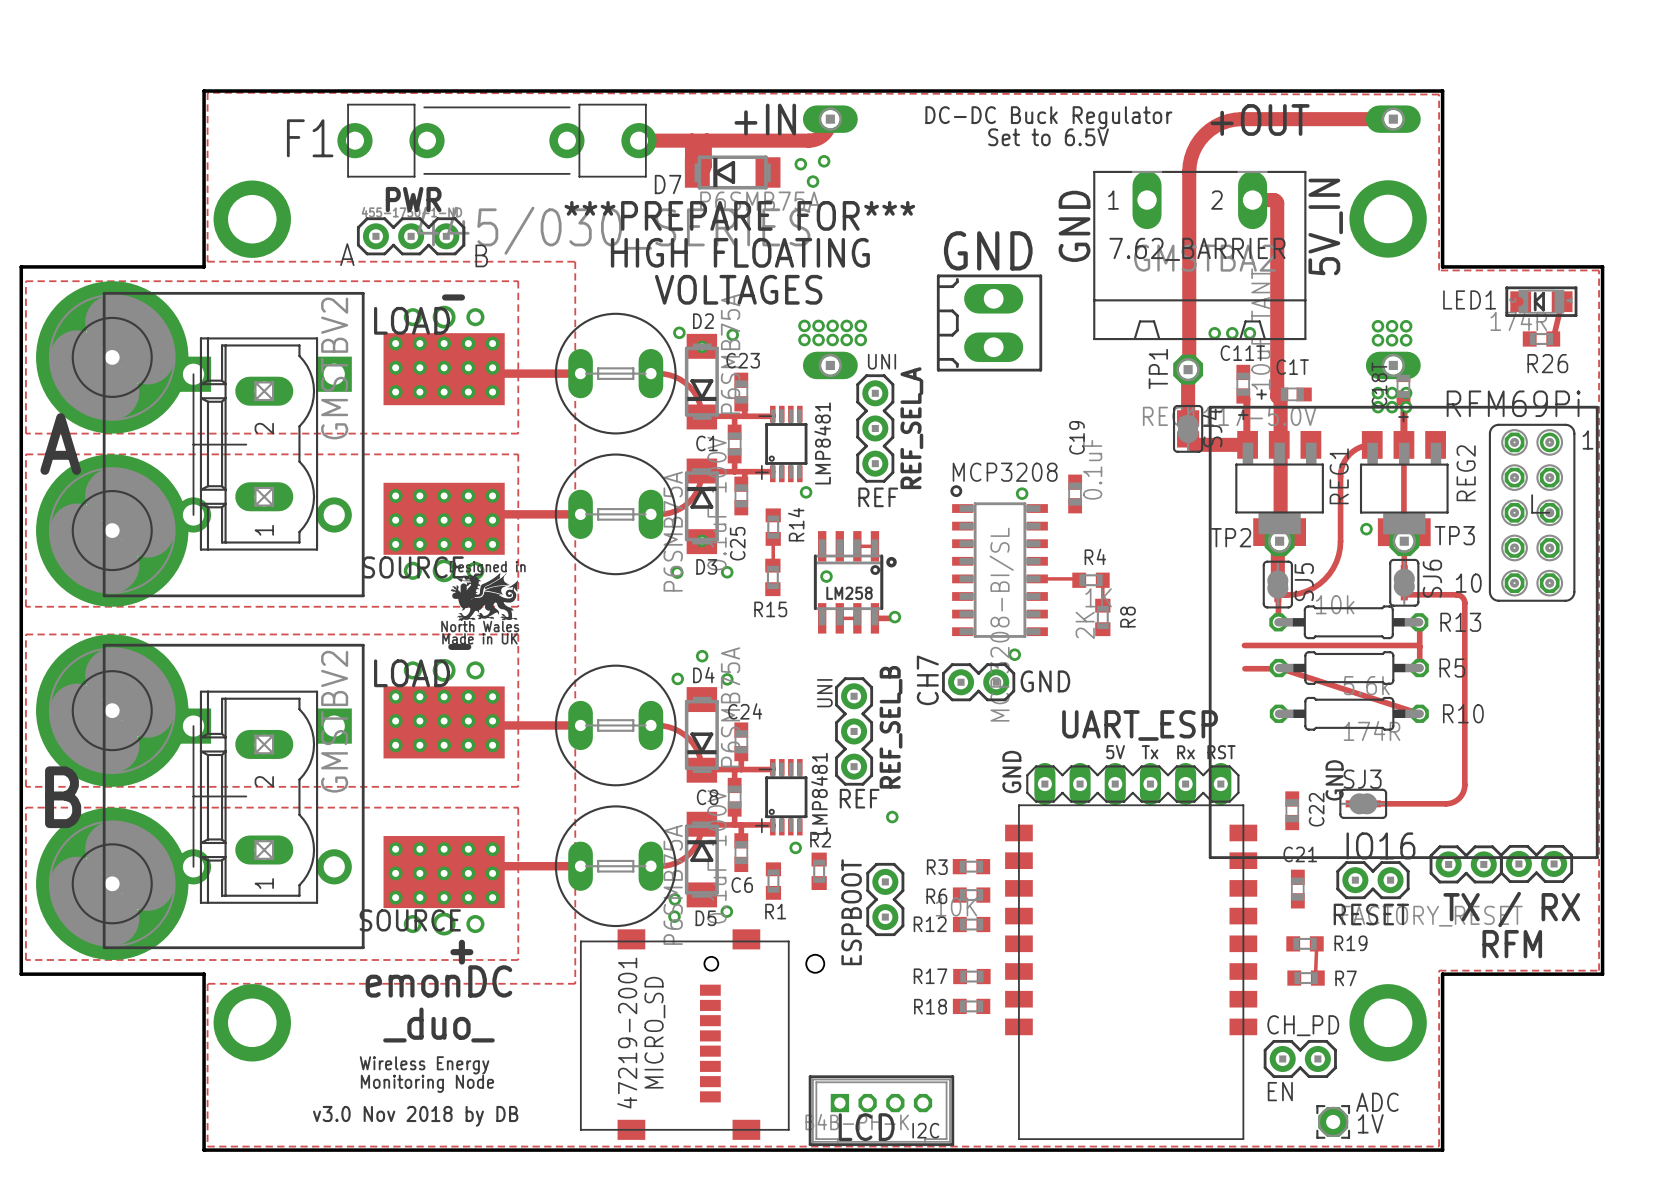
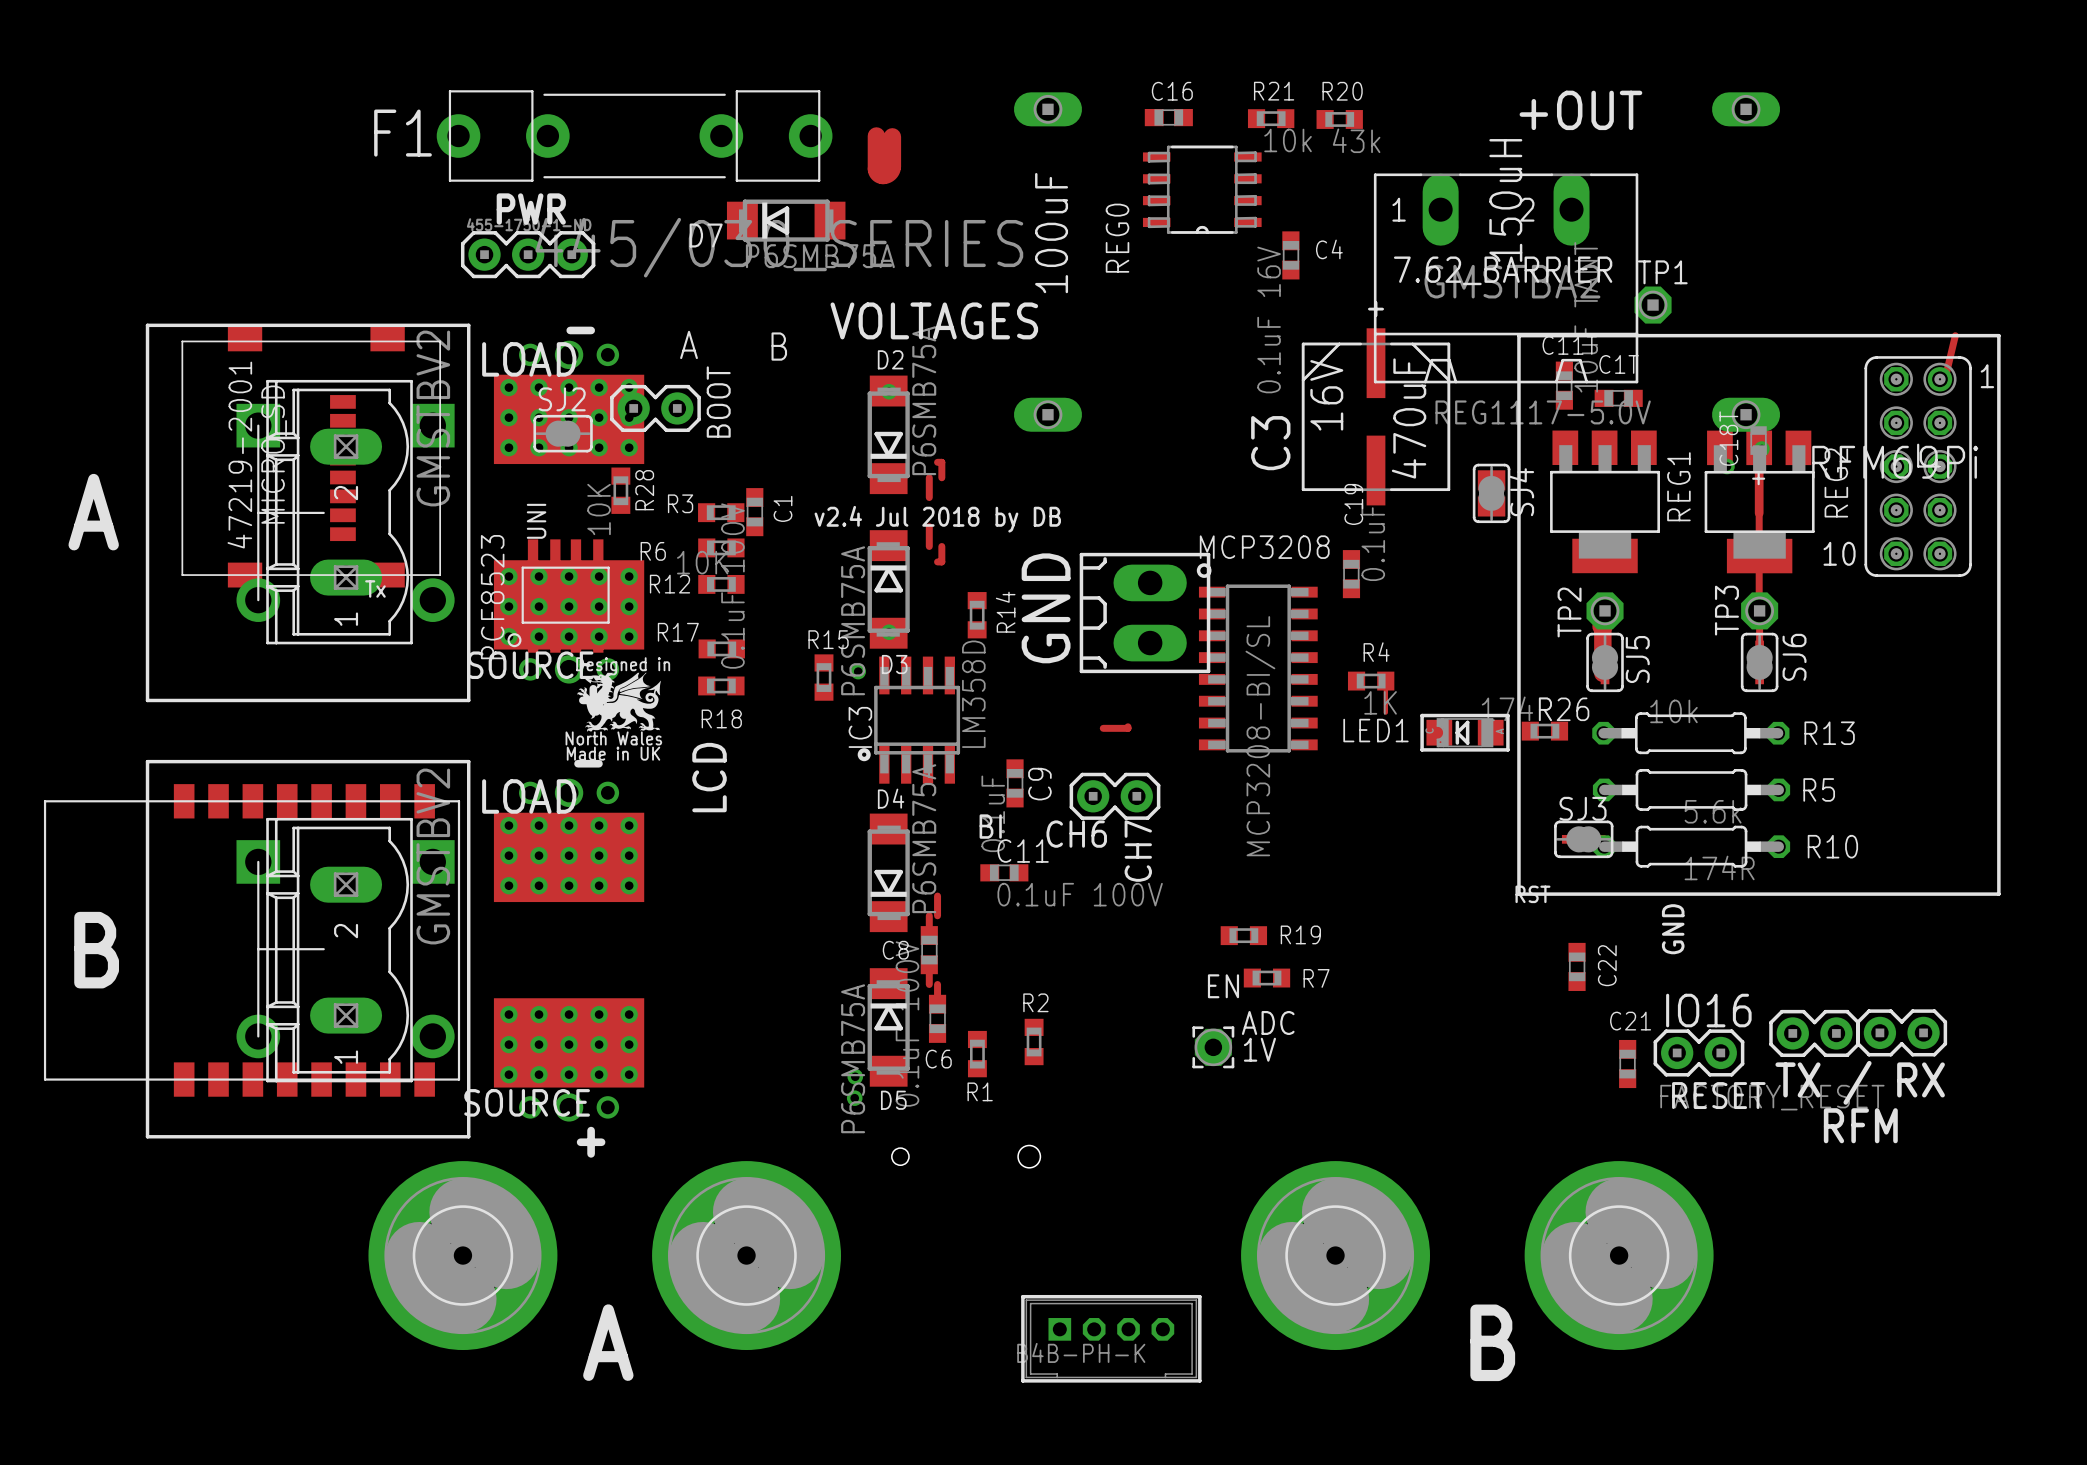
board edge: (204, 90) (204, 266) (21, 266) (21, 974) (204, 974) (204, 1150) (1442, 1150) (1442, 974) (1602, 974) (1602, 266) (1442, 266) (1442, 90) (204, 90) -> none
zone outline: (207, 92) (207, 261) (575, 261) (575, 983) (207, 983) (207, 1146) (1439, 1146) (1439, 970) (1599, 970) (1599, 270) (1439, 270) (1439, 94) (207, 92) -> none
text: DC-DC Buck Regulator (1048, 117) -> none
text: +IN (765, 119) -> none
track: (830, 119) (828, 127) (824, 134) (811, 140) (638, 140) -> none
track: (1393, 119) (1235, 119) (1215, 126) (1200, 139) (1193, 151) (1189, 171) (1188, 418) -> none
C16: none -> (1168, 117)
R21: none -> 10k (1271, 118)
R20: none -> 43k (1339, 119)
text: Set to 6.5V (1048, 137) -> none
via: (824, 161) -> none
via: (800, 164) -> none
D7 position: (732, 172) -> (786, 220)
via: (813, 181) -> none
REG0: none -> (1202, 189)
text: none -> 150uH (1505, 200)
track: (1252, 200) (1274, 200) (1277, 203) (1277, 396) -> none
text: ***PREPARE FOR*** (739, 215) -> none
text: none -> 100uF (1051, 233)
via: (1388, 218) -> none
via: (252, 219) -> none
text: GND (1074, 226) -> none
text: 5V_IN (1325, 226) -> none
C4: none -> 0.1uF 16V (1290, 255)
GND name rotation: 0° (988, 250) -> 90° counterclockwise (1046, 608)
text: HIGH FLOATING (740, 252) -> none
text position: A (347, 254) -> A (689, 344)
text position: B (481, 255) -> B (779, 346)
zone outline: (25, 281) (25, 433) (518, 433) (518, 281) (25, 281) -> none
LED1 position: (1541, 301) -> (1465, 732)
GND position: (989, 323) -> (1145, 612)
via: (804, 325) -> none
via: (818, 325) -> none
via: (832, 325) -> none
via: (846, 325) -> none
via: (860, 325) -> none
via: (1377, 326) -> none
via: (1392, 326) -> none
via: (1406, 326) -> none
via: (679, 332) -> none
via: (1214, 333) -> none
via: (1232, 333) -> none
via: (1249, 333) -> none
via: (732, 334) -> none
R26 position: (1541, 338) -> (1544, 731)
via: (804, 340) -> none
via: (818, 340) -> none
via: (832, 340) -> none
via: (846, 340) -> none
via: (860, 340) -> none
via: (1377, 340) -> none
via: (1392, 340) -> none
via: (1406, 340) -> none
text: none -> 16V (1326, 395)
C3: none -> (1376, 403)
part: (112, 357) -> none
BOOT: none -> (655, 408)
text: UNI (882, 361) -> none
R26 name position: R26 (1547, 363) -> R26 (1564, 709)
C11T footprint: [1236, 364, 1251, 421] -> [1555, 361, 1573, 410]
text: none -> 470uF (1409, 418)
TP1 name rotation: 0° (1158, 368) -> 90° clockwise (1662, 272)
track: (444, 369) (448, 373) (580, 373) -> none
TP1 position: (1188, 369) -> (1653, 305)
part: (615, 373) -> none
track: (650, 373) (669, 375) (684, 382) (698, 400) (701, 416) (772, 416) (772, 414) -> none
SJ2: none -> (563, 433)
C1T footprint: [1256, 387, 1312, 402] -> [1594, 389, 1643, 407]
C23: (741, 392) -> none
via: (1377, 393) -> none
via: (1392, 393) -> none
track: (1243, 395) (1246, 399) (1247, 444) (1193, 444) -> none
track: (1277, 396) (1280, 394) (1279, 541) (1278, 397) (1277, 396) -> none
part: none -> (311, 456)
via: (1392, 407) -> none
via: (1406, 407) -> none
R28: none -> 10K (620, 490)
REF_SEL_A: (875, 428) -> none
C1 name rotation: 0° (706, 443) -> 90° counterclockwise (783, 508)
C1 name position: C1 (706, 443) -> C1 (783, 508)
C1 position: (734, 443) -> (754, 512)
part: (786, 443) -> none
text: LMP8481 (822, 443) -> none
track: (1372, 444) (1360, 447) (1352, 451) (1347, 457) (1341, 468) (1340, 548) (1333, 568) (1324, 579) (1307, 591) (1293, 594) (1277, 595) (1278, 622) -> none
text: none -> v2.4 Jul 2018 by DB (937, 519)
text: none -> UNI (536, 521)
zone outline: (25, 454) (25, 606) (518, 606) (518, 454) (25, 454) -> none
track: (701, 471) (772, 471) -> none
track: (701, 471) (698, 488) (685, 505) (670, 512) (650, 514) -> none
REG1 position: (1279, 488) -> (1605, 501)
REG2 position: (1404, 488) -> (1759, 501)
via: (806, 492) -> none
via: (1022, 493) -> none
C25: (741, 495) -> none
text: REF (878, 497) -> none
text: none -> Tx (375, 588)
PCF8523: none -> (558, 596)
track: (580, 514) (434, 514) -> none
part: (615, 514) -> none
via: (1366, 529) -> none
part: (112, 530) -> none
TP3 name rotation: 0° (1454, 535) -> 90° counterclockwise (1726, 610)
TP3 name position: TP3 (1454, 535) -> TP3 (1726, 610)
TP2 name rotation: 0° (1231, 537) -> 90° counterclockwise (1569, 612)
track: (773, 538) (772, 565) -> none
TP2 position: (1279, 541) -> (1605, 610)
TP3 position: (1404, 541) -> (1759, 610)
track: (857, 546) (874, 546) -> none
drawing position: (891, 562) -> (864, 754)
via: (727, 572) -> none
via: (826, 576) -> none
R15 position: (772, 577) -> (824, 677)
track: (1037, 578) (1079, 580) -> none
LM258: (848, 582) -> none
SJ6 position: (1404, 582) -> (1759, 662)
SJ5 position: (1277, 584) -> (1605, 662)
track: (1404, 593) (1457, 594) (1464, 600) (1464, 787) (1459, 798) (1448, 803) (1373, 803) -> none
R15 name position: R15 (770, 609) -> R15 (828, 639)
IC3: none -> LM358D (917, 720)
via: (894, 617) -> none
R8: 2K (1102, 617) -> none
track: (839, 618) (857, 618) -> none
track: (1419, 622) (1419, 668) -> none
part position: (1403, 632) -> (1758, 614)
zone outline: (25, 634) (25, 786) (518, 786) (518, 634) (25, 634) -> none
track: (1244, 645) (1419, 646) -> none
via: (1014, 654) -> none
via: (702, 656) -> none
text: none -> LCD (709, 777)
C9: none -> 0.1uF (1015, 783)
track: (1244, 668) (1278, 668) (1419, 713) -> none
via: (677, 678) -> none
via: (727, 679) -> none
text position: CH7 (927, 680) -> CH7 (1138, 851)
text: GND (1045, 681) -> none
part position: (978, 682) -> (1115, 796)
text: UNI (824, 693) -> none
text: none -> BI (990, 826)
text: none -> CH6 (1076, 834)
part: (112, 710) -> none
track: (468, 721) (465, 725) (580, 725) -> none
part: (615, 725) -> none
track: (650, 725) (674, 728) (688, 738) (695, 747) (700, 758) (701, 764) (701, 770) (695, 770) (692, 767) (694, 769) (772, 769) (772, 767) -> none
REF_SEL_B: (854, 731) -> none
C11: none -> 0.1uF 100V (1004, 872)
C24: (741, 741) -> none
text: 5V (1115, 752) -> none
text: Tx (1150, 752) -> none
text: Rx (1186, 752) -> none
text: GND (1011, 772) -> none
part: UART_ESP (1132, 784) -> none
part: none -> (252, 940)
text: LMP8481 (819, 793) -> none
part: (786, 797) -> none
text: REF (859, 798) -> none
SJ3 position: (1363, 803) -> (1583, 839)
zone outline: (25, 807) (518, 807) (518, 960) (25, 960) (25, 807) -> none
C22 position: (1292, 810) -> (1577, 966)
via: (892, 817) -> none
track: (701, 824) (772, 824) (772, 827) -> none
track: (701, 824) (696, 845) (685, 857) (670, 864) (650, 866) -> none
text: none -> EN (1223, 986)
via: (795, 847) -> none
part position: (1536, 863) -> (1901, 1032)
part position: (1466, 864) -> (1814, 1033)
track: (580, 866) (460, 866) -> none
part: (615, 866) -> none
R3 position: (971, 866) -> (721, 512)
R3 name position: R3 (937, 867) -> R3 (680, 503)
ADC: none -> (1213, 1047)
text: none -> 1V (1259, 1049)
IO16 position: (1372, 880) -> (1698, 1052)
part: (112, 883) -> none
R6 position: (971, 895) -> (721, 547)
R6 name position: R6 (936, 896) -> R6 (653, 551)
ESPBOOT: (885, 899) -> none
text position: TX / RX (1511, 909) -> TX / RX (1860, 1082)
via: (726, 911) -> none
R12 position: (971, 924) -> (721, 584)
R19 position: (1305, 943) -> (1243, 935)
track: (1316, 943) (1315, 972) (1317, 978) -> none
text position: RFM (1512, 944) -> RFM (1860, 1125)
part: (1131, 972) -> none
R17 name position: R17 (930, 976) -> R17 (678, 632)
R17 position: (971, 976) -> (721, 648)
R7 position: (1306, 978) -> (1266, 978)
text: emonDC (438, 981) -> none
R18 name position: R18 (930, 1006) -> R18 (721, 718)
R18 position: (971, 1006) -> (721, 685)
via: (252, 1022) -> none
via: (1388, 1022) -> none
text: _duo_ (438, 1024) -> none
part: (684, 1034) -> none
part: none -> (462, 1255)
part: none -> (746, 1255)
part: none -> (1335, 1255)
part: none -> (1619, 1255)
CH_PD: (1300, 1058) -> none
text: Wireless Energy (424, 1065) -> none
text: Monitoring Node (427, 1083) -> none
text: EN (1280, 1091) -> none
text: none -> A (608, 1342)
text: none -> B (1492, 1342)
text: v3.0 Nov 2018 by DB (415, 1116) -> none
ADC: (1333, 1121) -> none
text: 1V (1370, 1123) -> none
text: LCD (866, 1127) -> none
text: I2C (925, 1130) -> none

